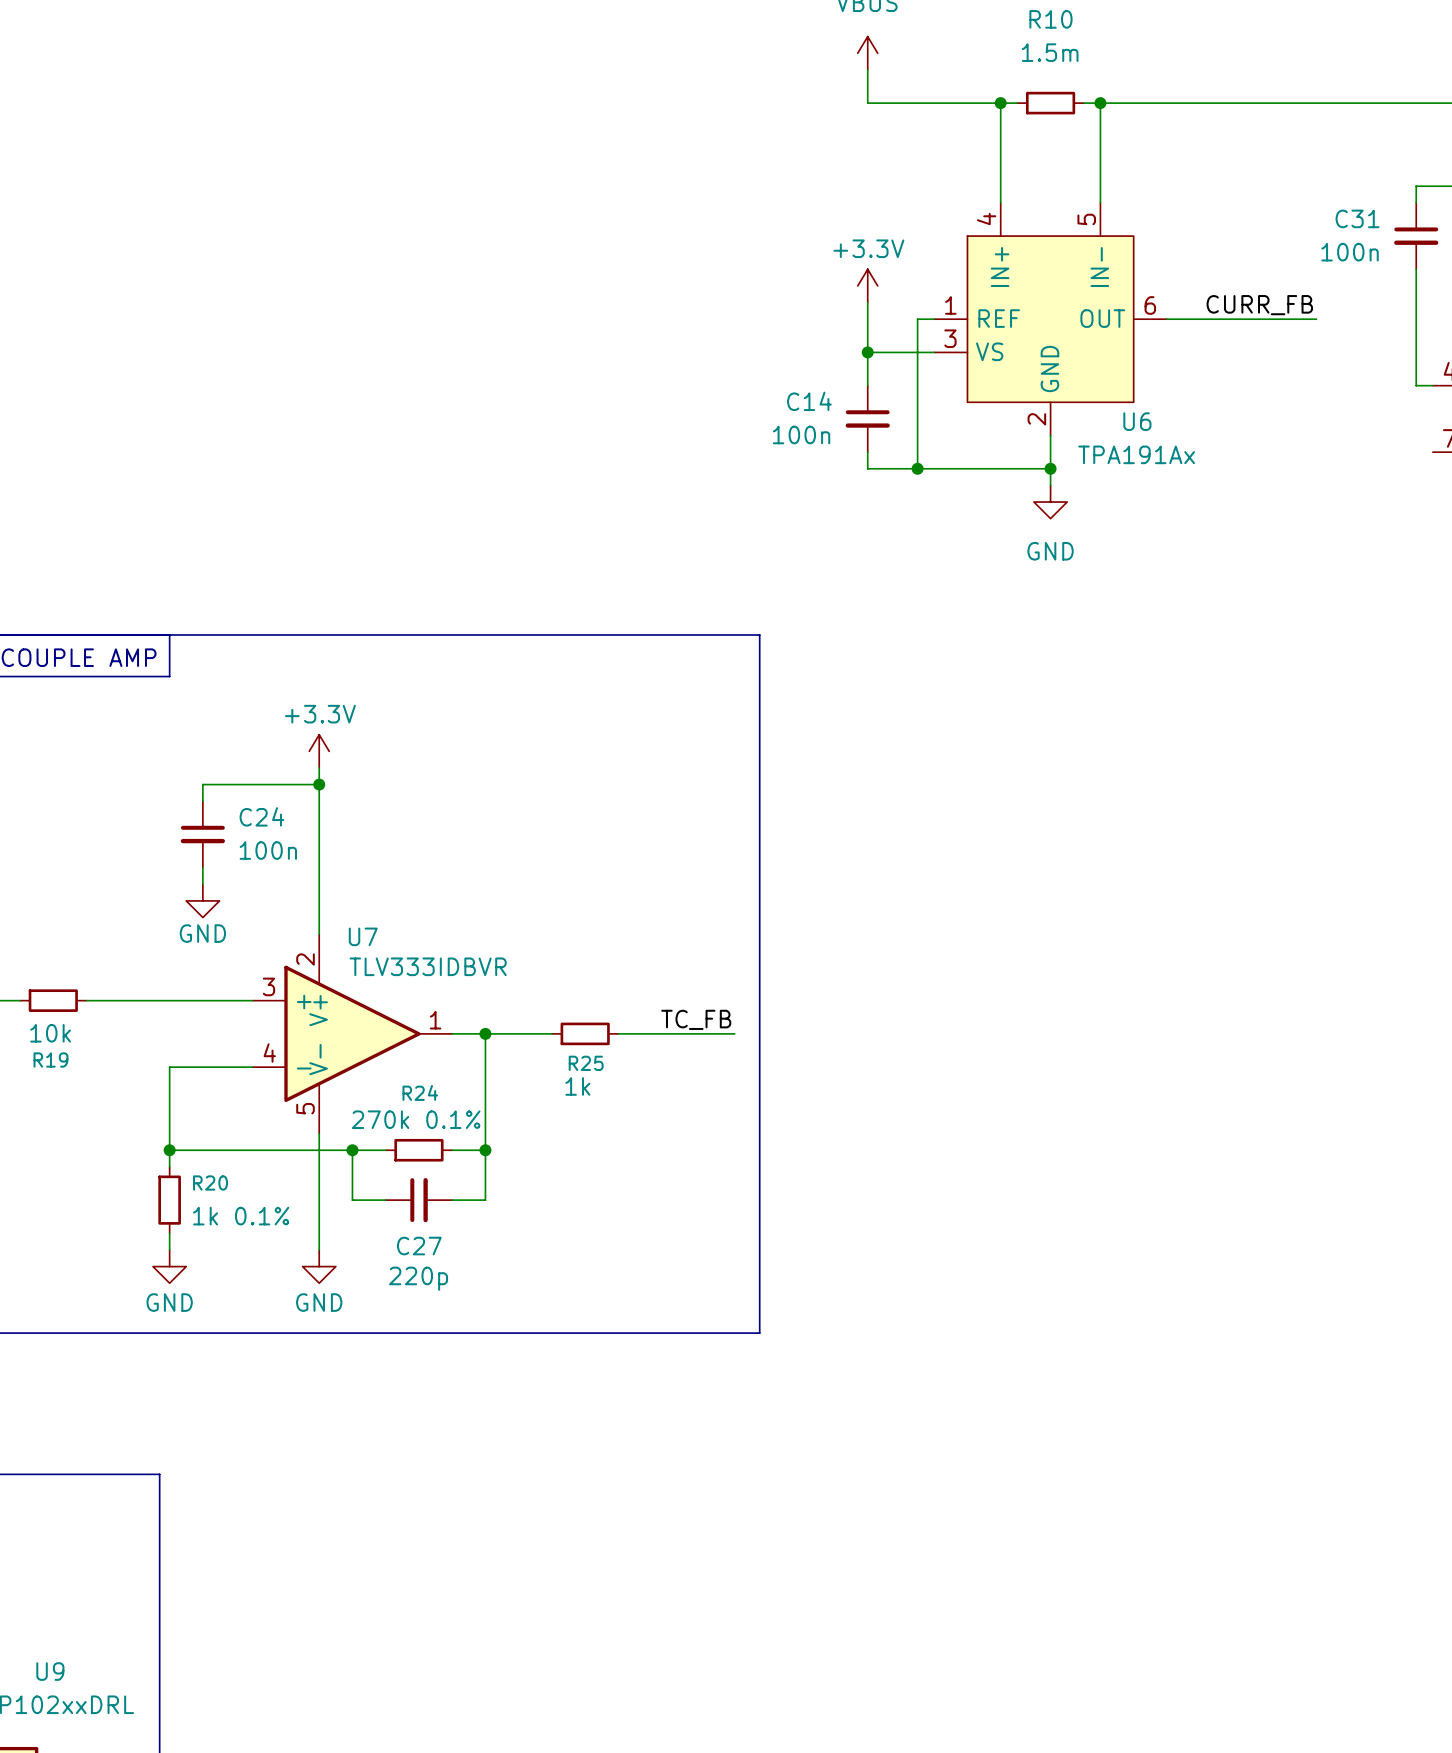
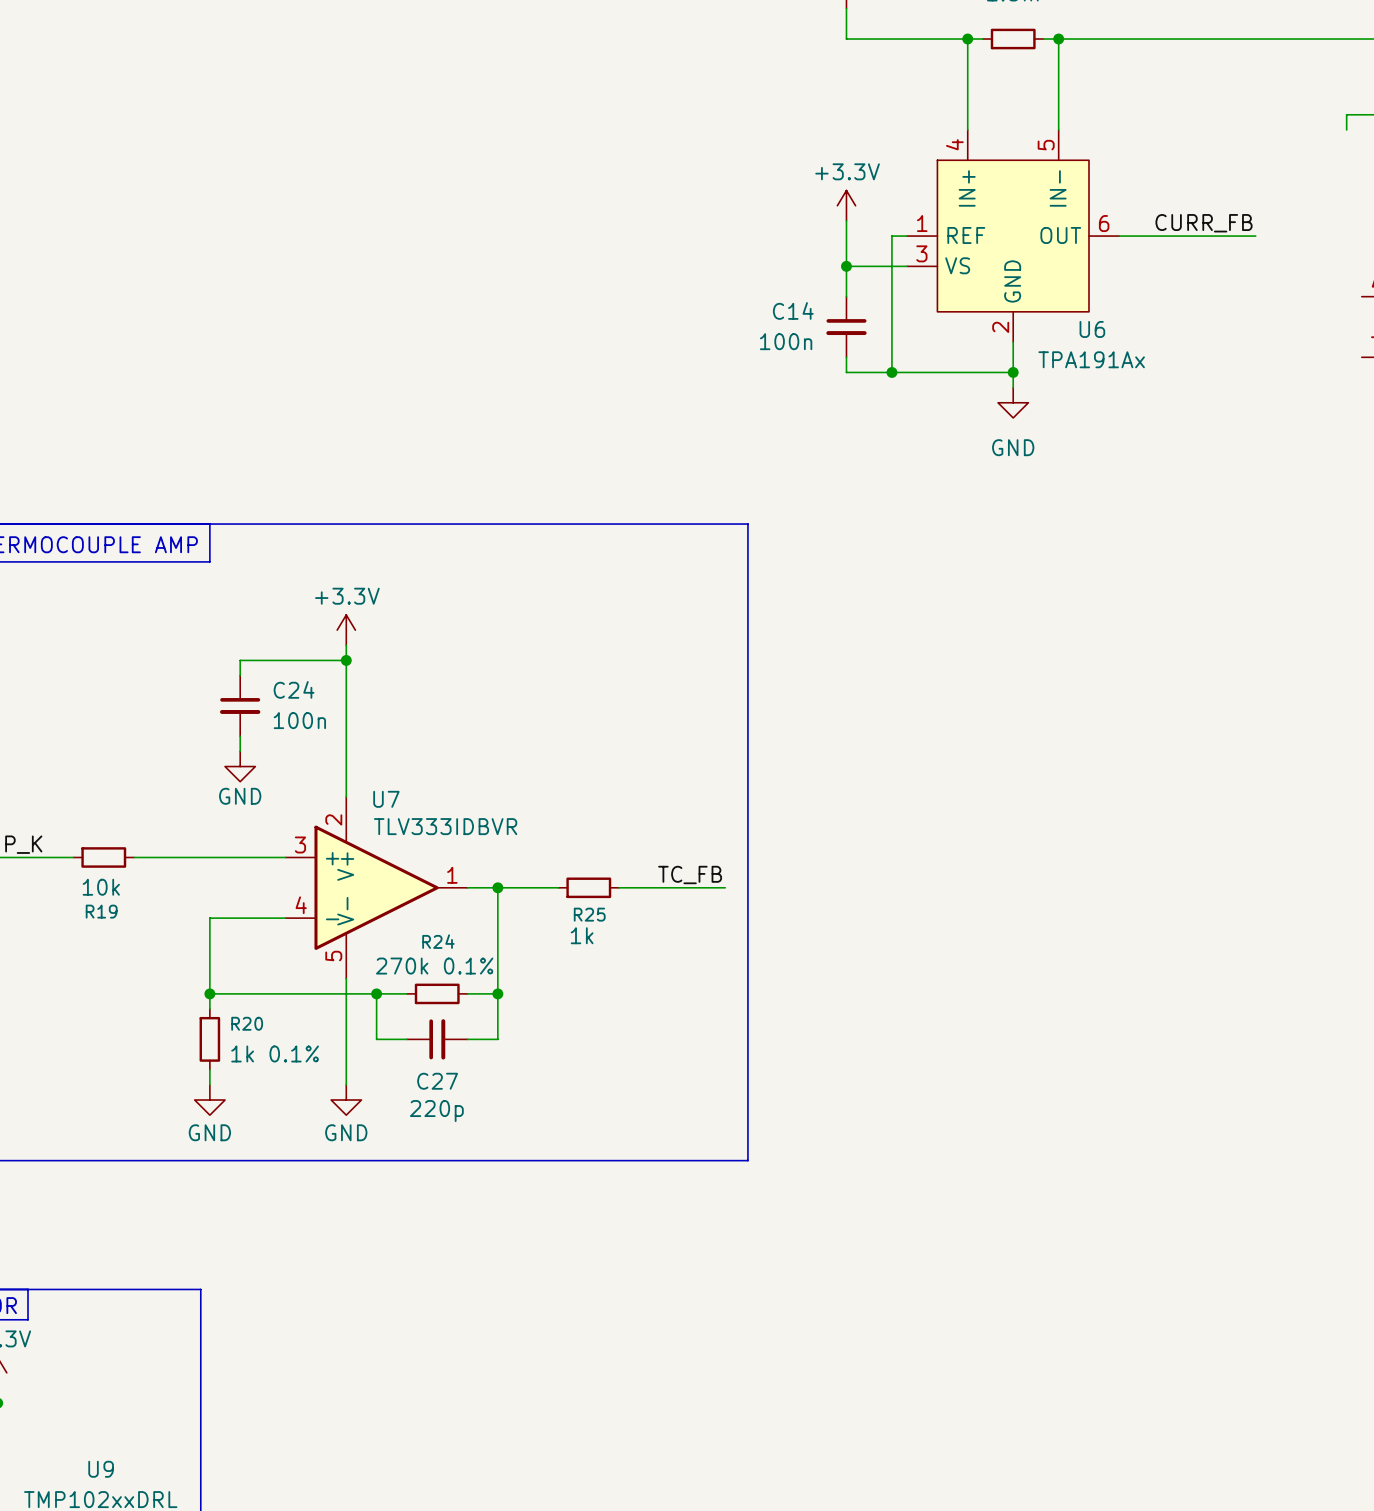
C31: 100n (1416, 236) -> none
wire: (1416, 269) (1416, 385) (1432, 385) -> none

